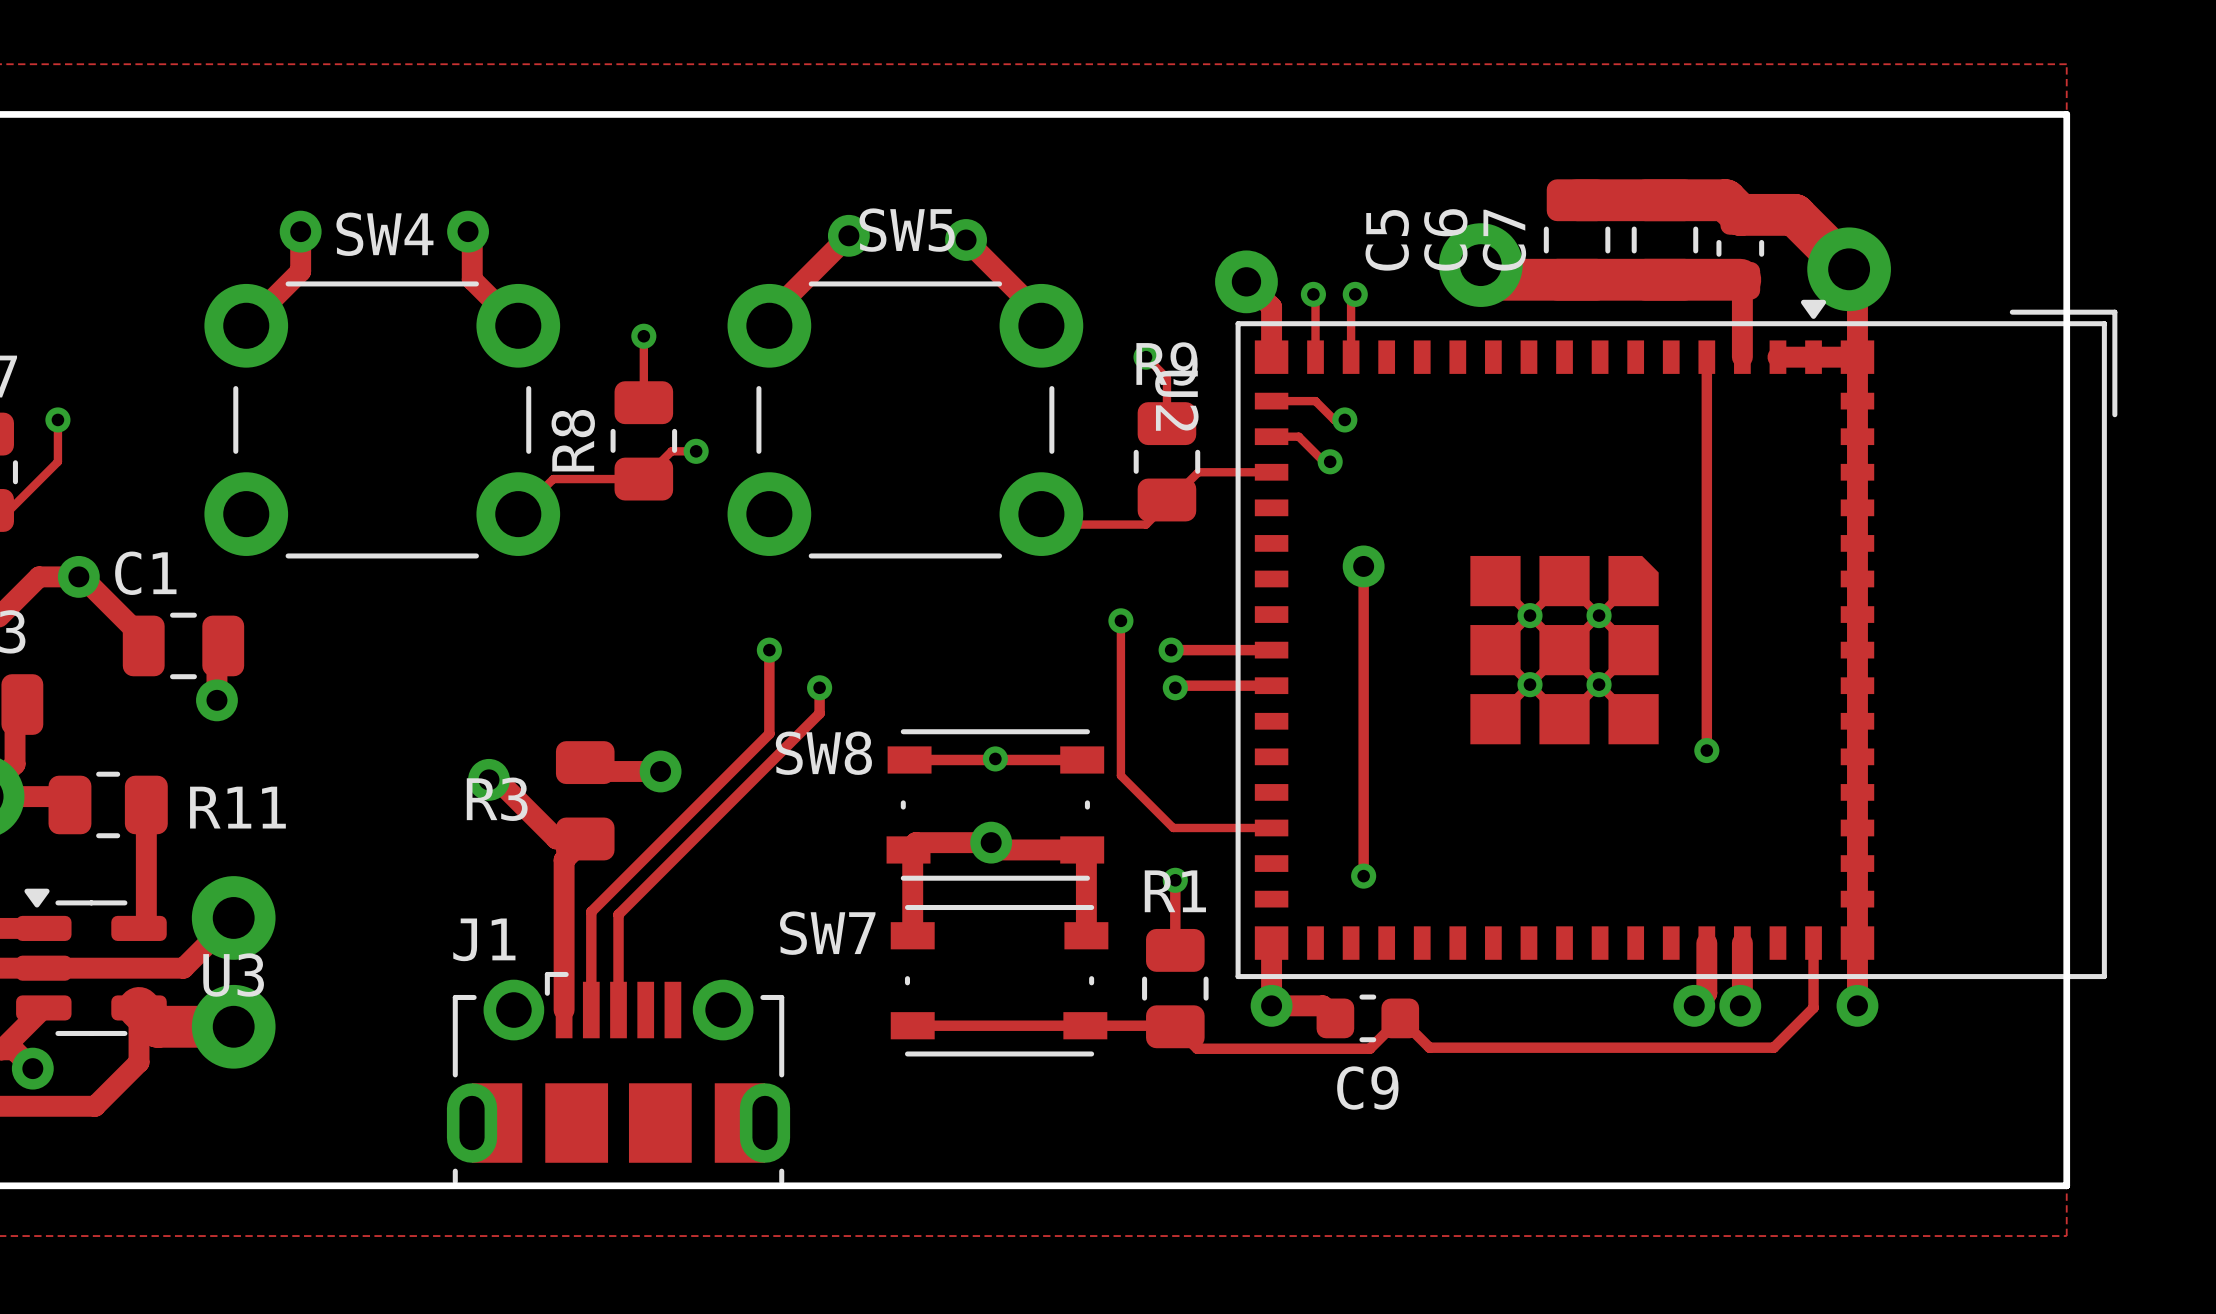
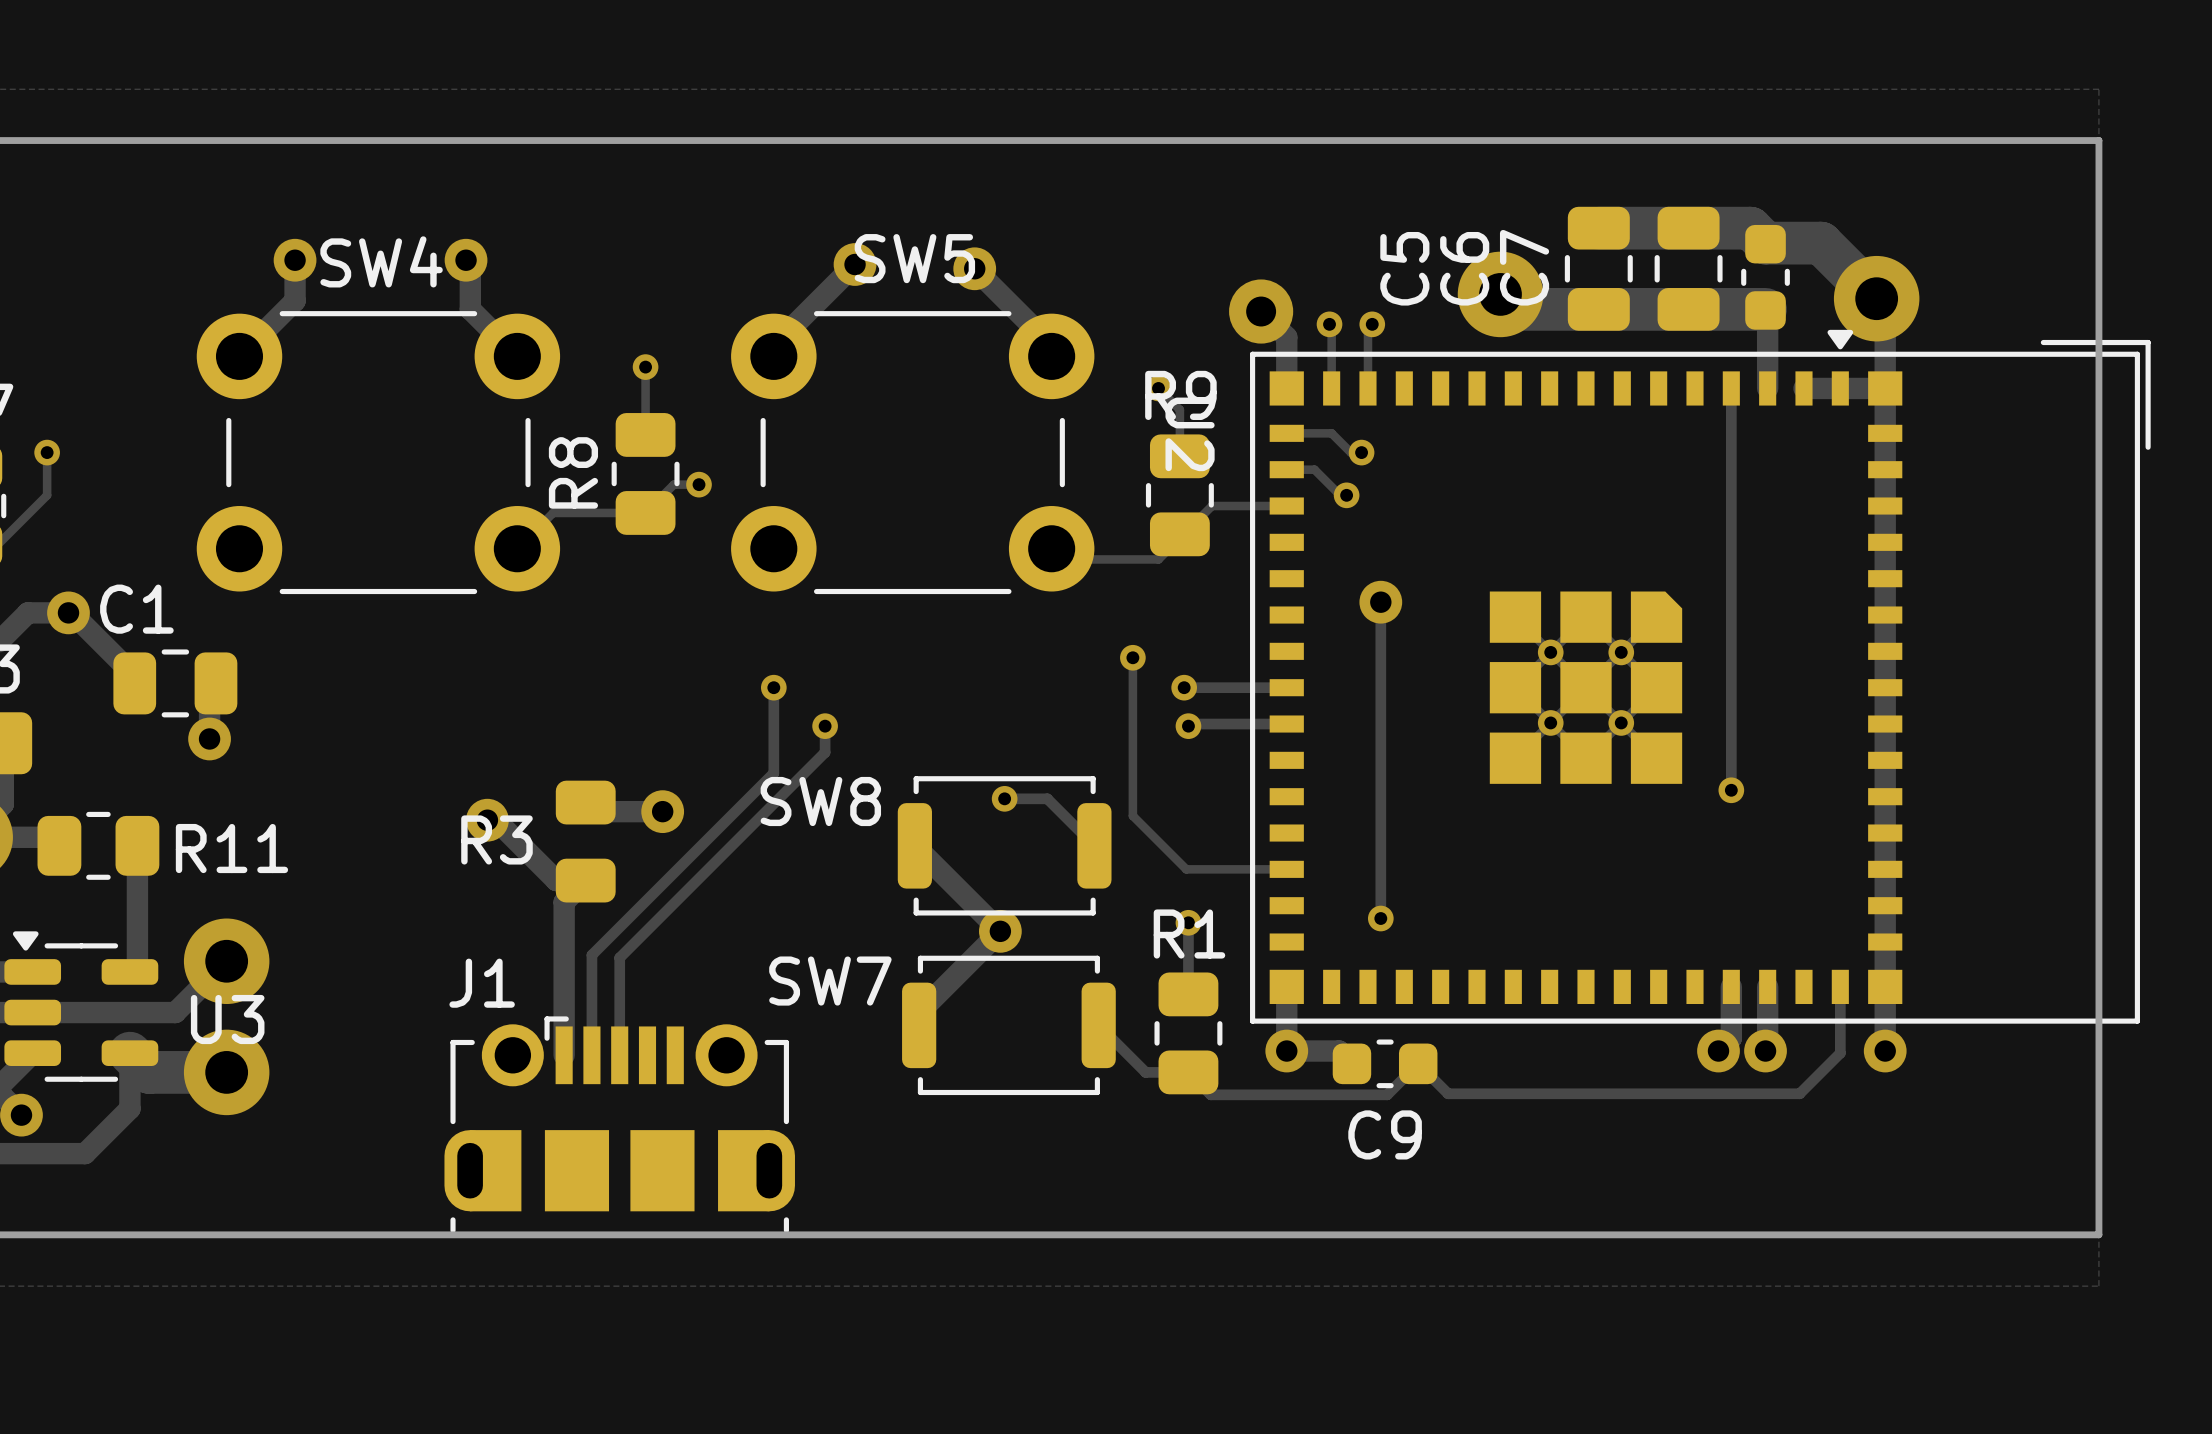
SW8 footprint: [886, 729, 1105, 881] -> [897, 776, 1112, 916]
track: (995, 758) (1082, 759) -> (1004, 798) (1047, 798) (1094, 845)
track: (909, 759) (994, 759) -> none
track: none -> (914, 845) (1000, 931) (919, 1012) (919, 1025)
via position: (991, 842) -> (1000, 931)
SW7 footprint: [890, 904, 1109, 1057] -> [902, 955, 1116, 1096]
track: (912, 935) (912, 854) (908, 849) (915, 842) (991, 842) (998, 849) (1082, 849) (1086, 854) (1086, 935) -> none
track: (912, 1025) (1175, 1026) -> (1098, 1025) (1145, 1072) (1188, 1072)

